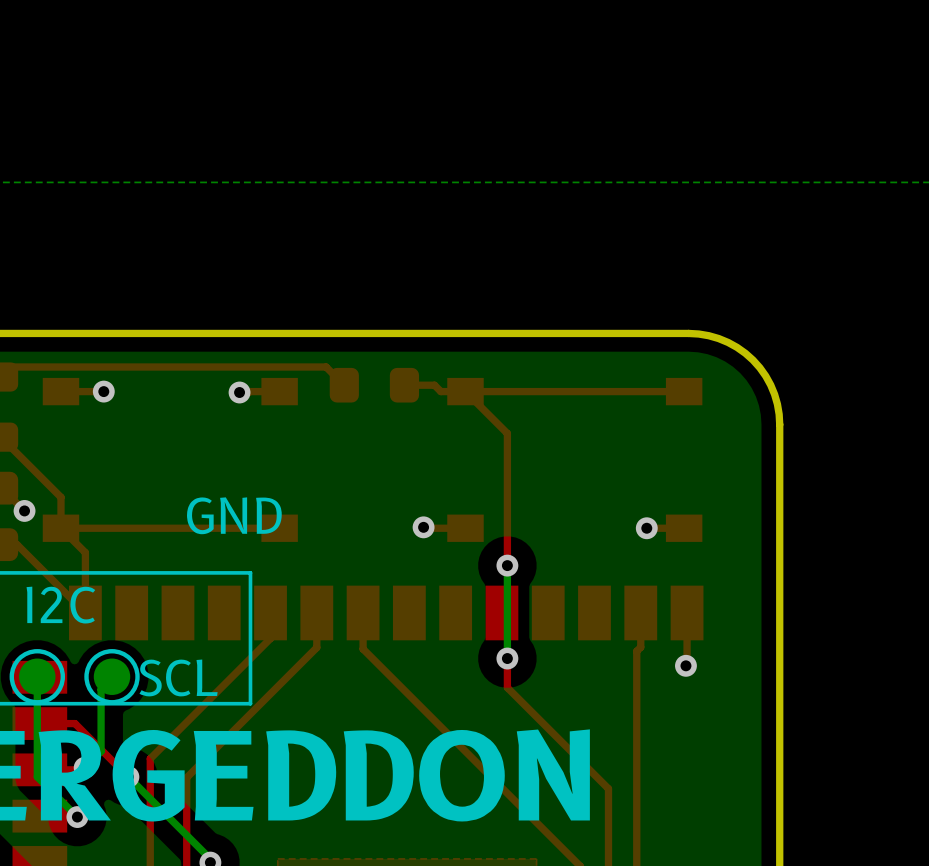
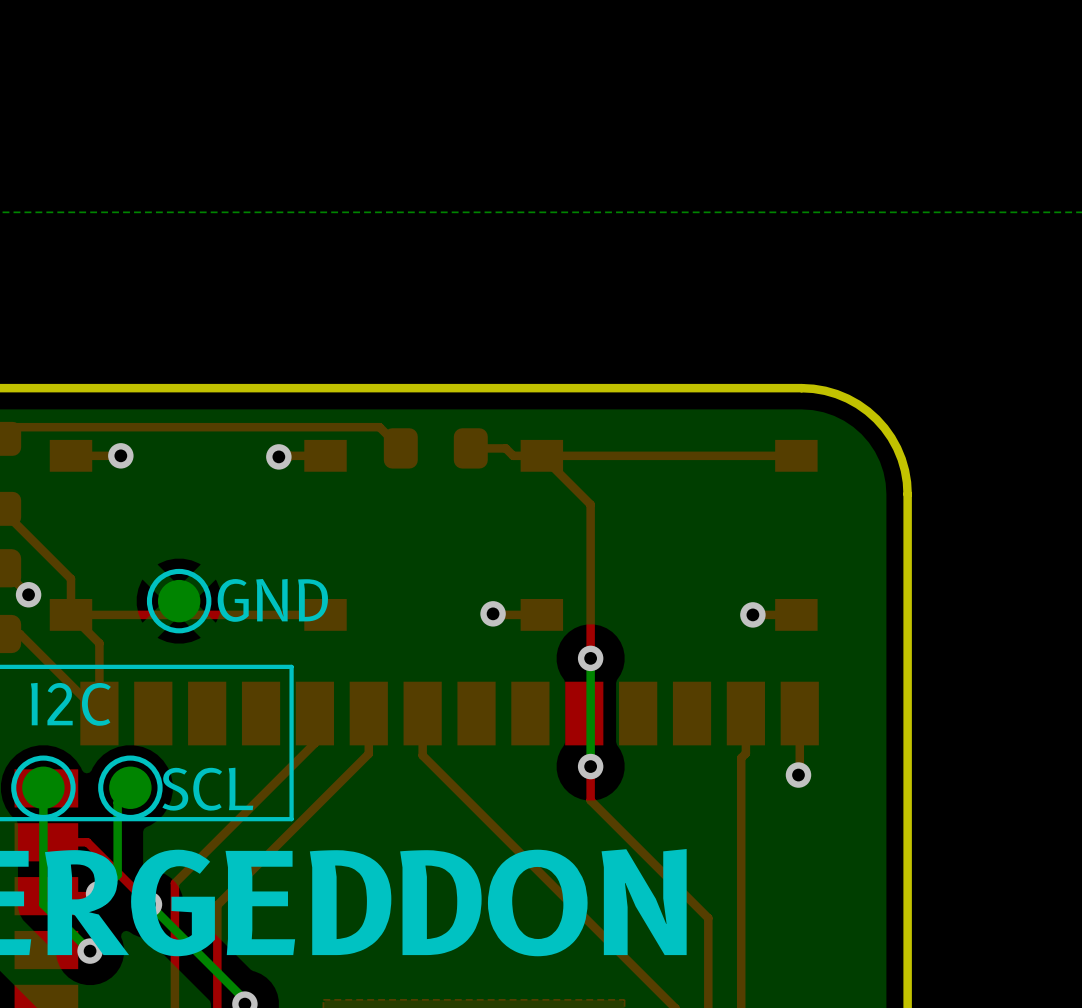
part: none -> (179, 601)

